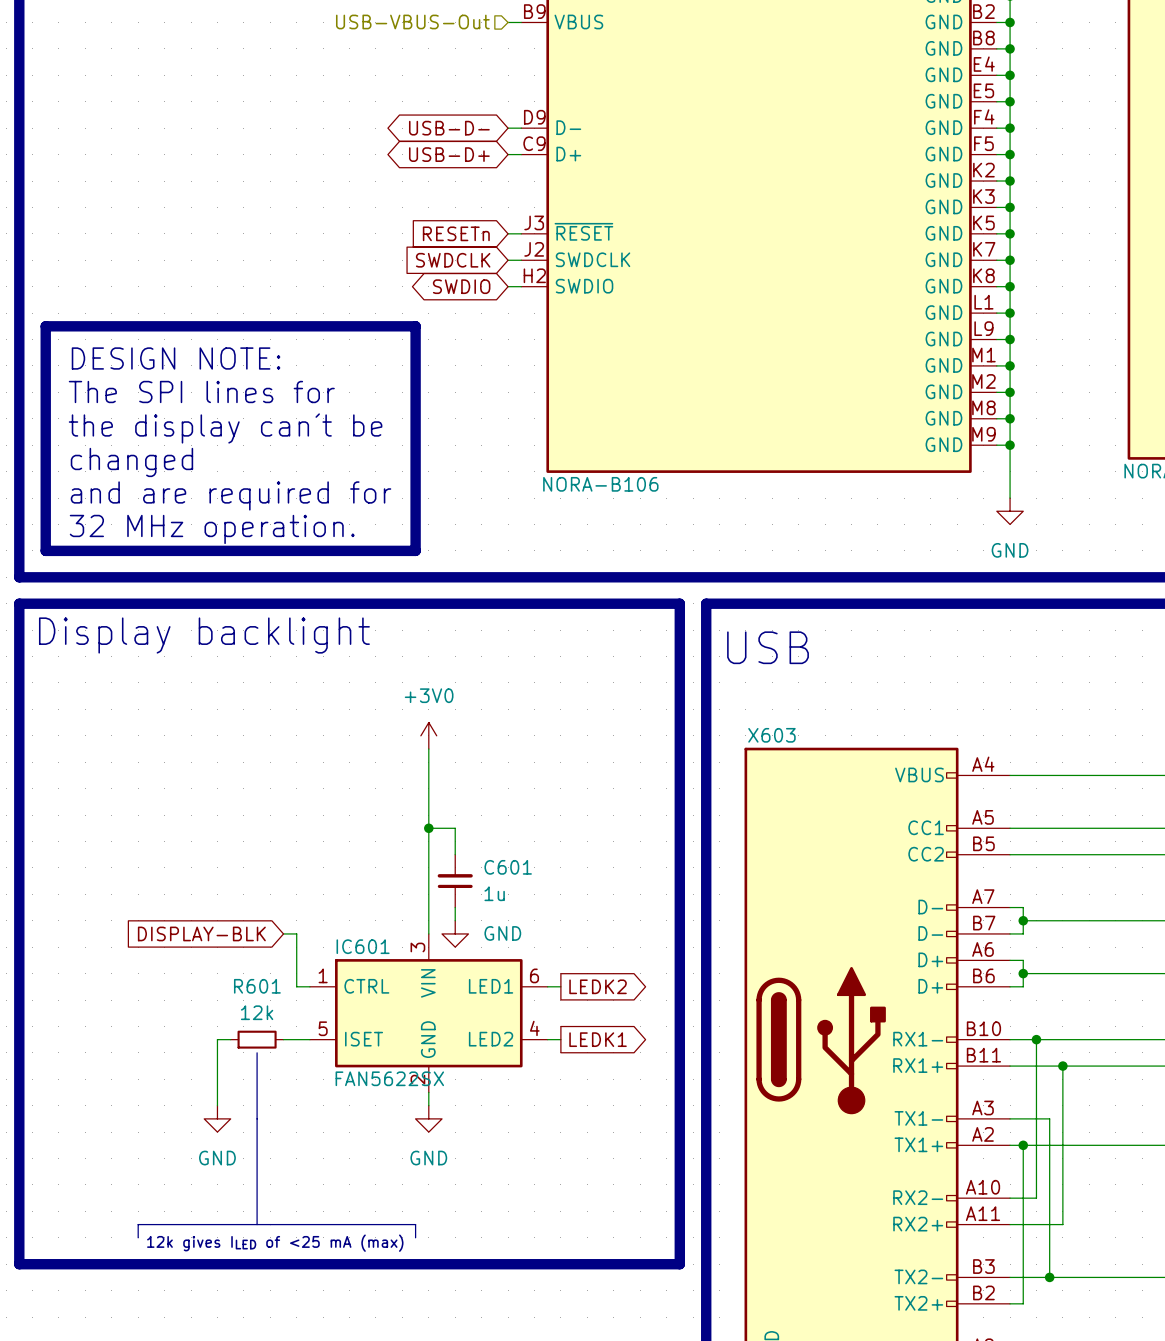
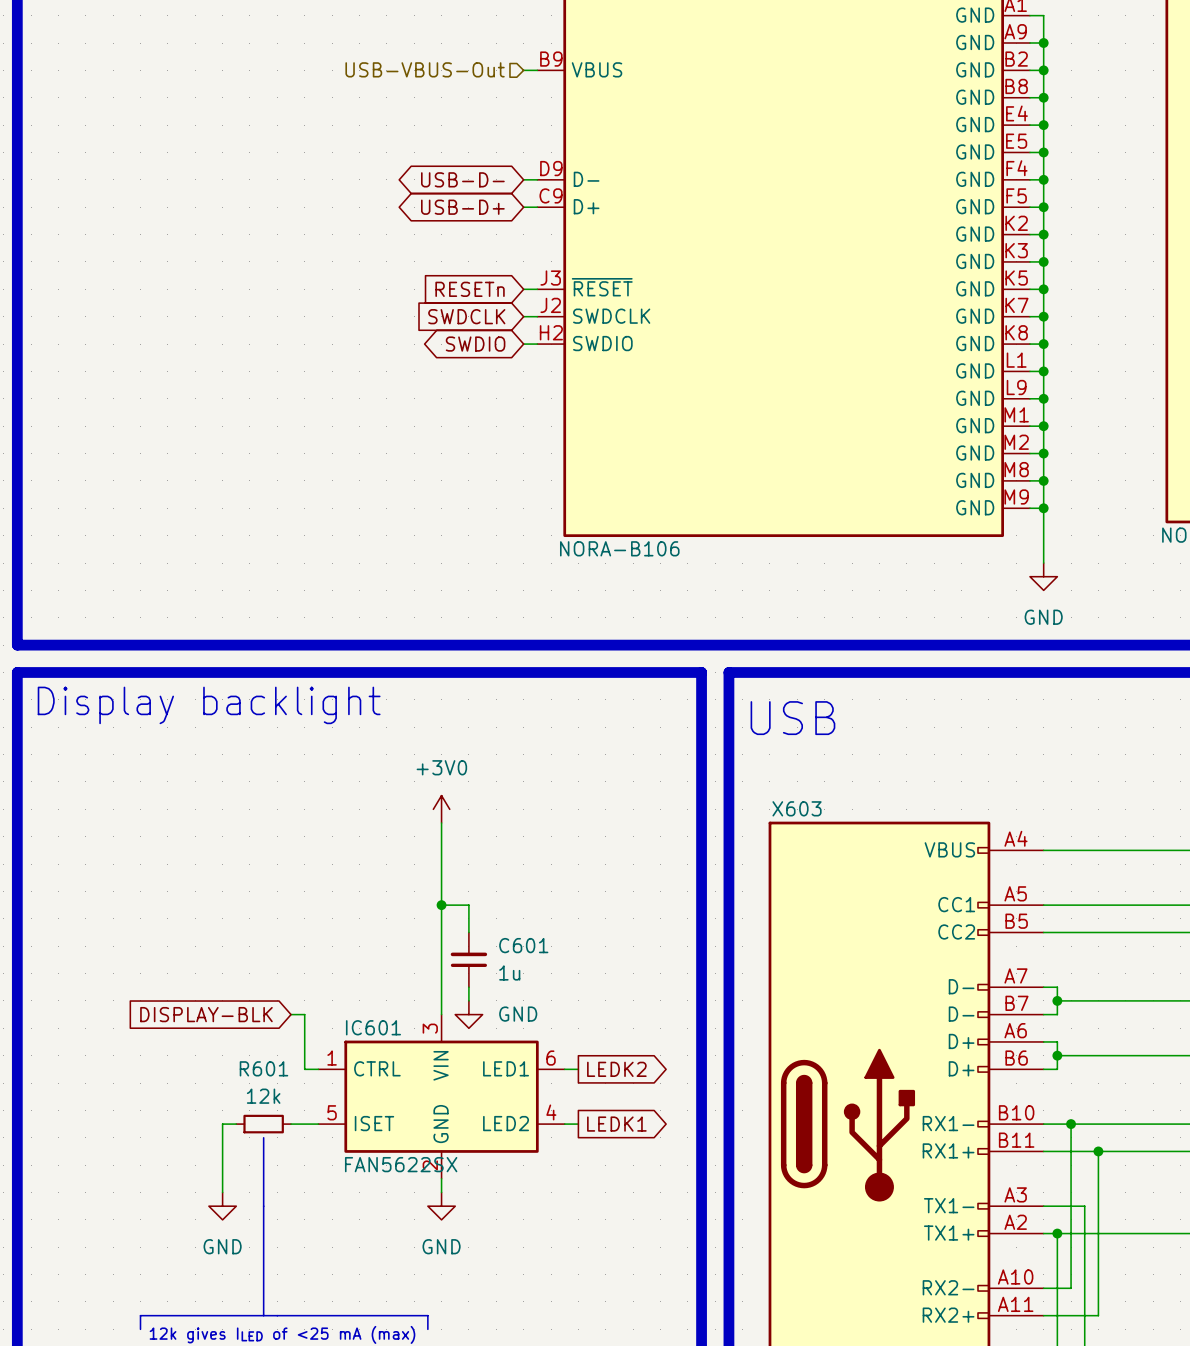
line: (45, 326) (415, 326) (415, 550) (45, 550) (45, 326) -> none
text: DESIGN NOTE: (176, 358) -> none
text: The SPI lines for (201, 392) -> none
text: the display can´t be (225, 428) -> none
text: changed (131, 462) -> none
text: and are required for (231, 495) -> none
text: 32 MHz operation. (212, 529) -> none

